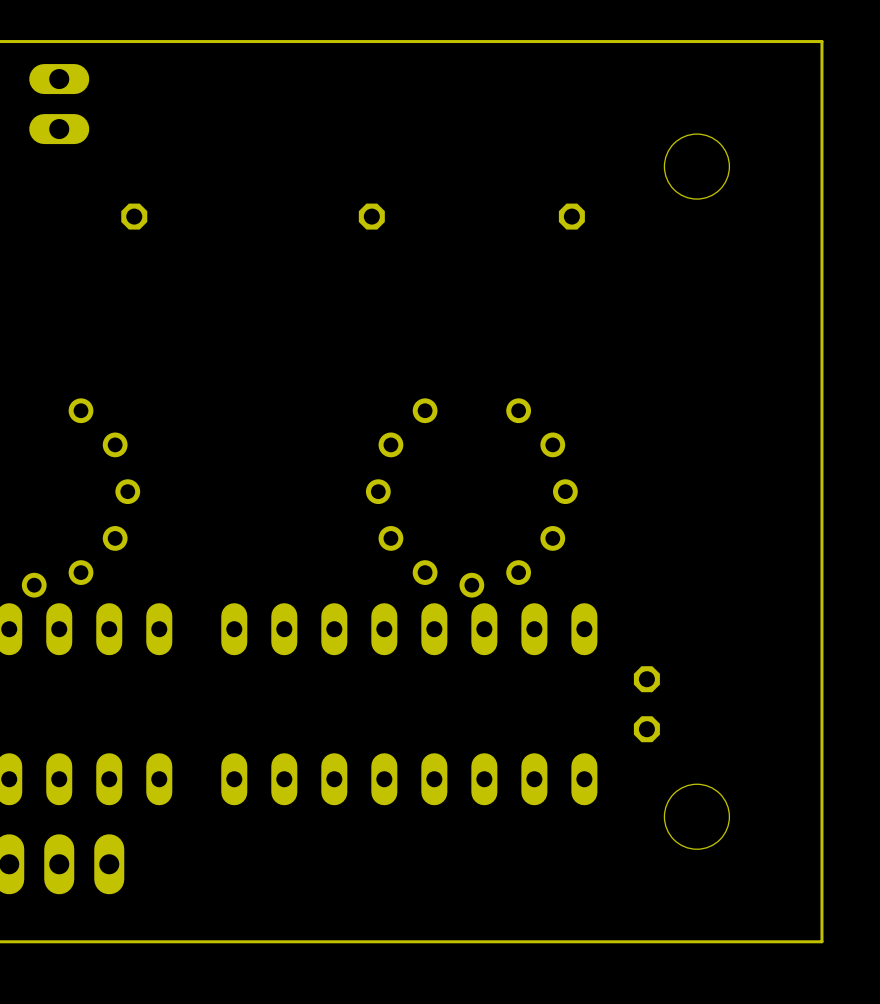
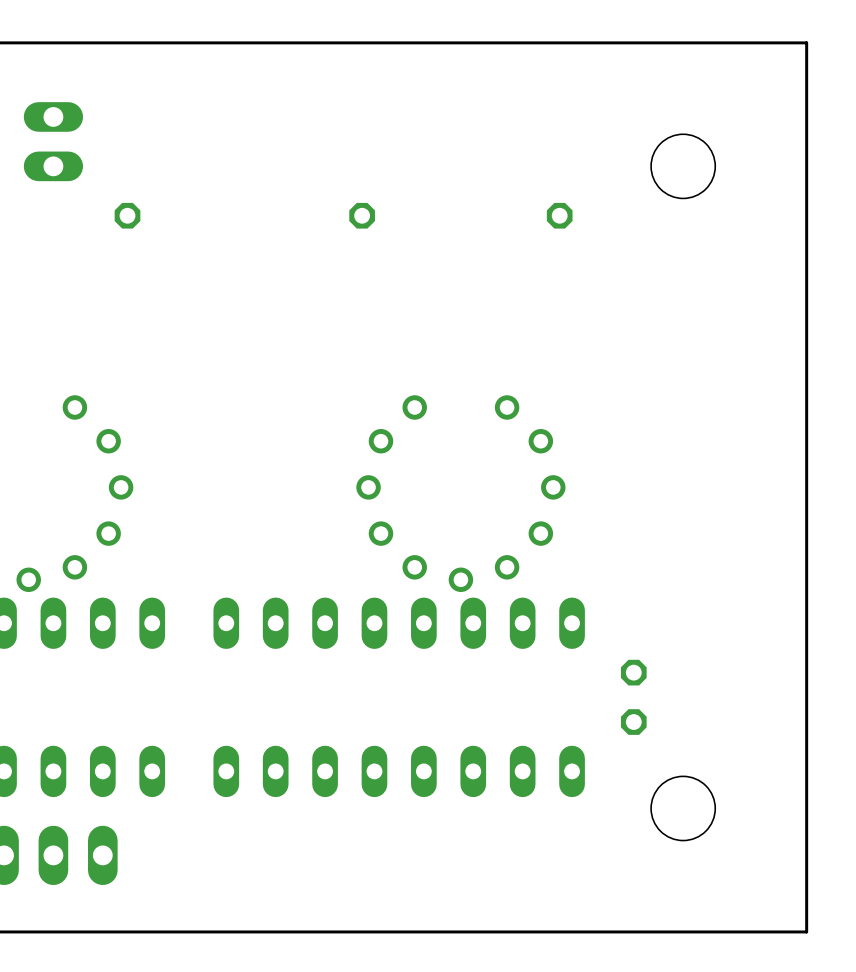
part position: (59, 104) -> (53, 141)

